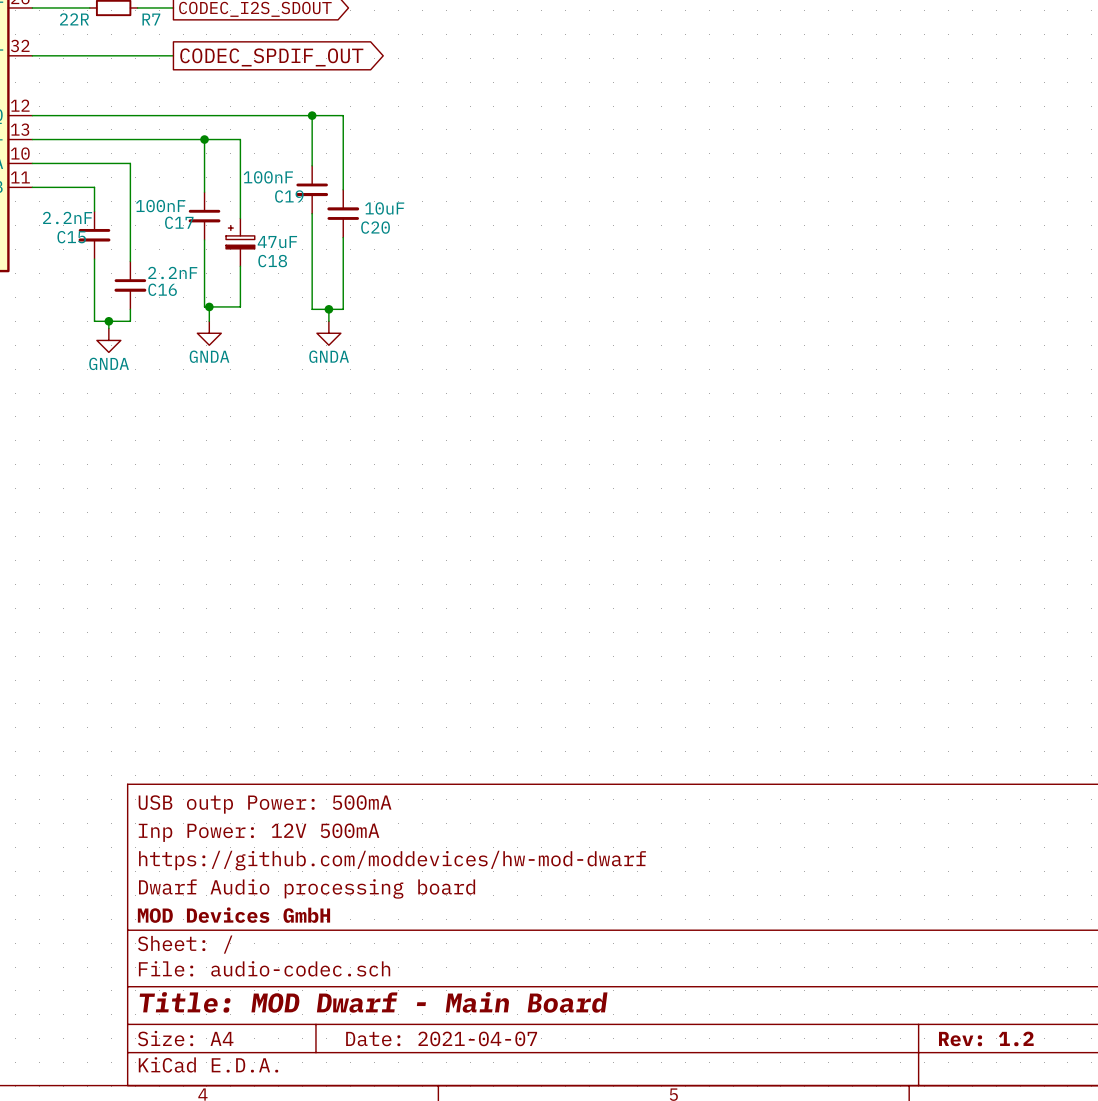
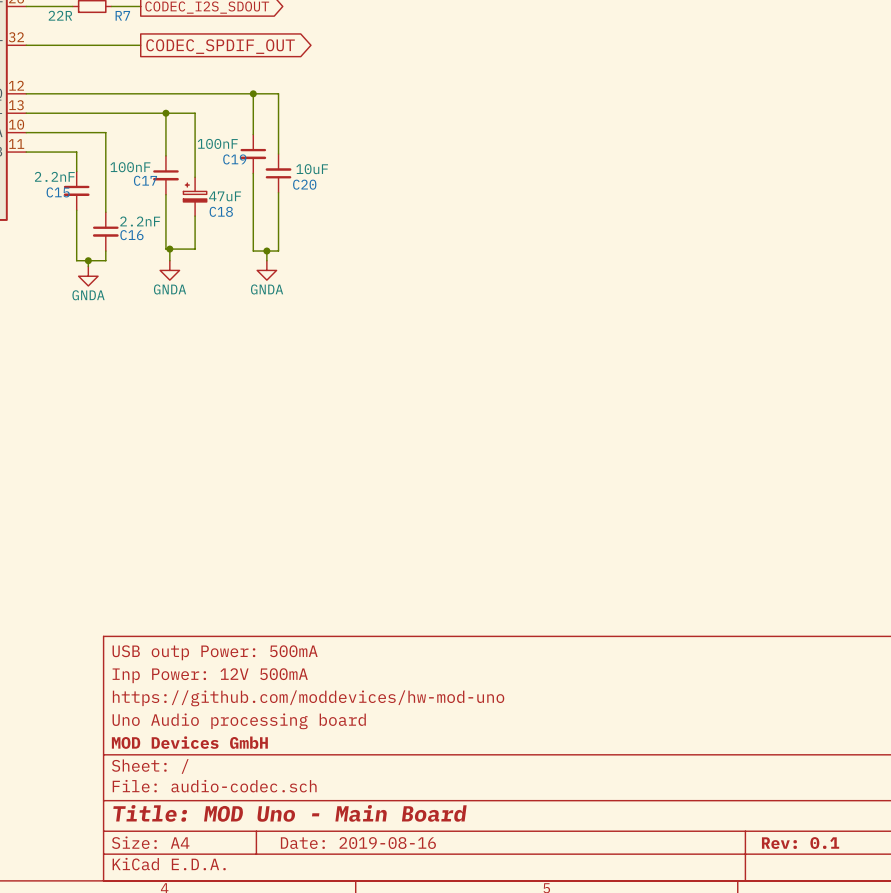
title block: https://github.com/moddevices/hw-mod-dwarf (392, 860) -> https://github.com/moddevices/hw-mod-uno (308, 698)
title block: Dwarf Audio processing board (307, 888) -> Uno Audio processing board (239, 721)
title block: Title: MOD Dwarf - Main Board (373, 1002) -> Title: MOD Uno - Main Board (289, 813)
title block: Date: 2021-04-07 (441, 1038) -> Date: 2019-08-16 (358, 843)
title block: Rev: 1.2 (986, 1038) -> Rev: 0.1 (800, 843)

